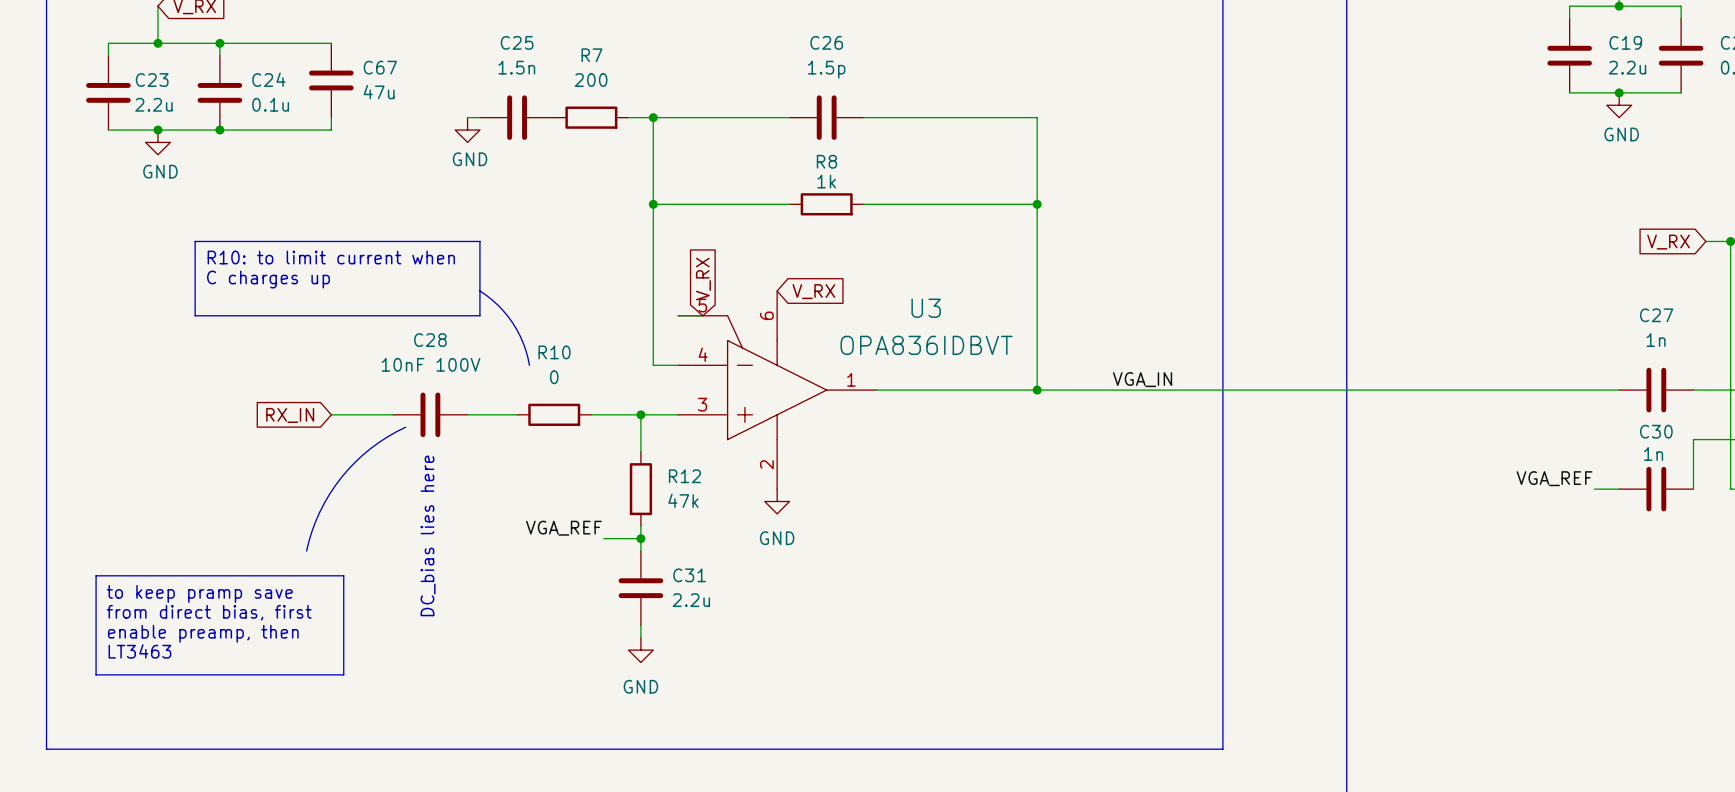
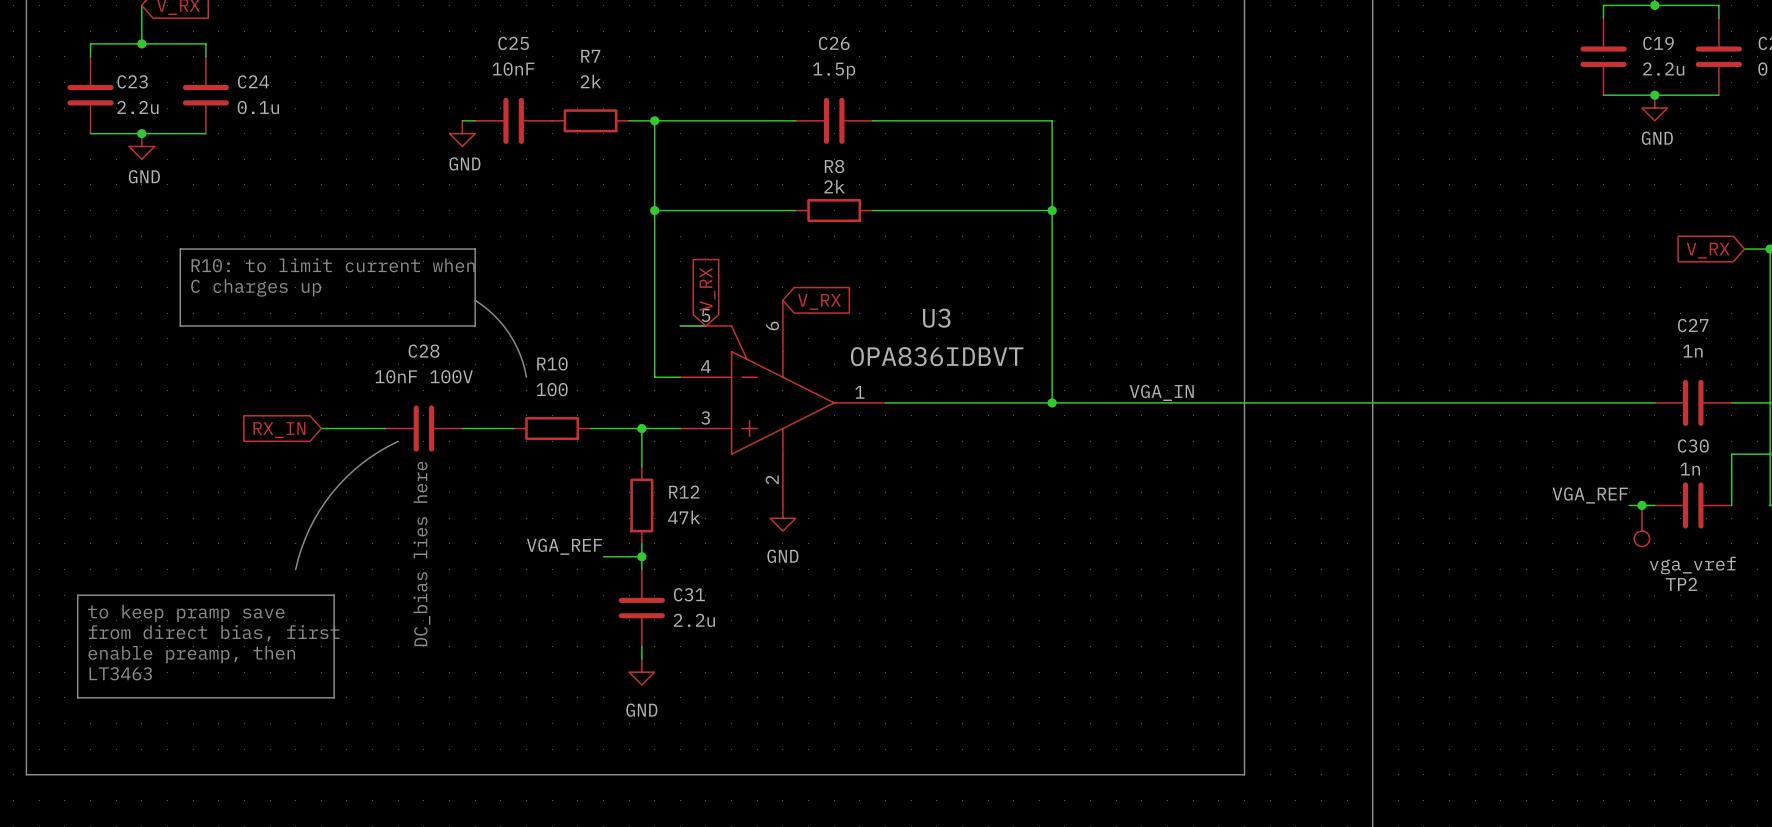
wire: (219, 43) (331, 43) -> none
junction: (219, 43) -> none
C25 value: 1.5n (516, 67) -> 10nF (513, 69)
C67: 47u (331, 80) -> none
R7 value: 200 (591, 80) -> 2k (590, 81)
wire: (331, 117) (331, 130) (219, 130) -> none
junction: (219, 130) -> none
R8 value: 1k (826, 181) -> 2k (834, 186)
R10 value: 0 (554, 377) -> 100 (552, 389)
junction: none -> (1641, 505)
TP2: none -> vga_vref (1641, 525)

